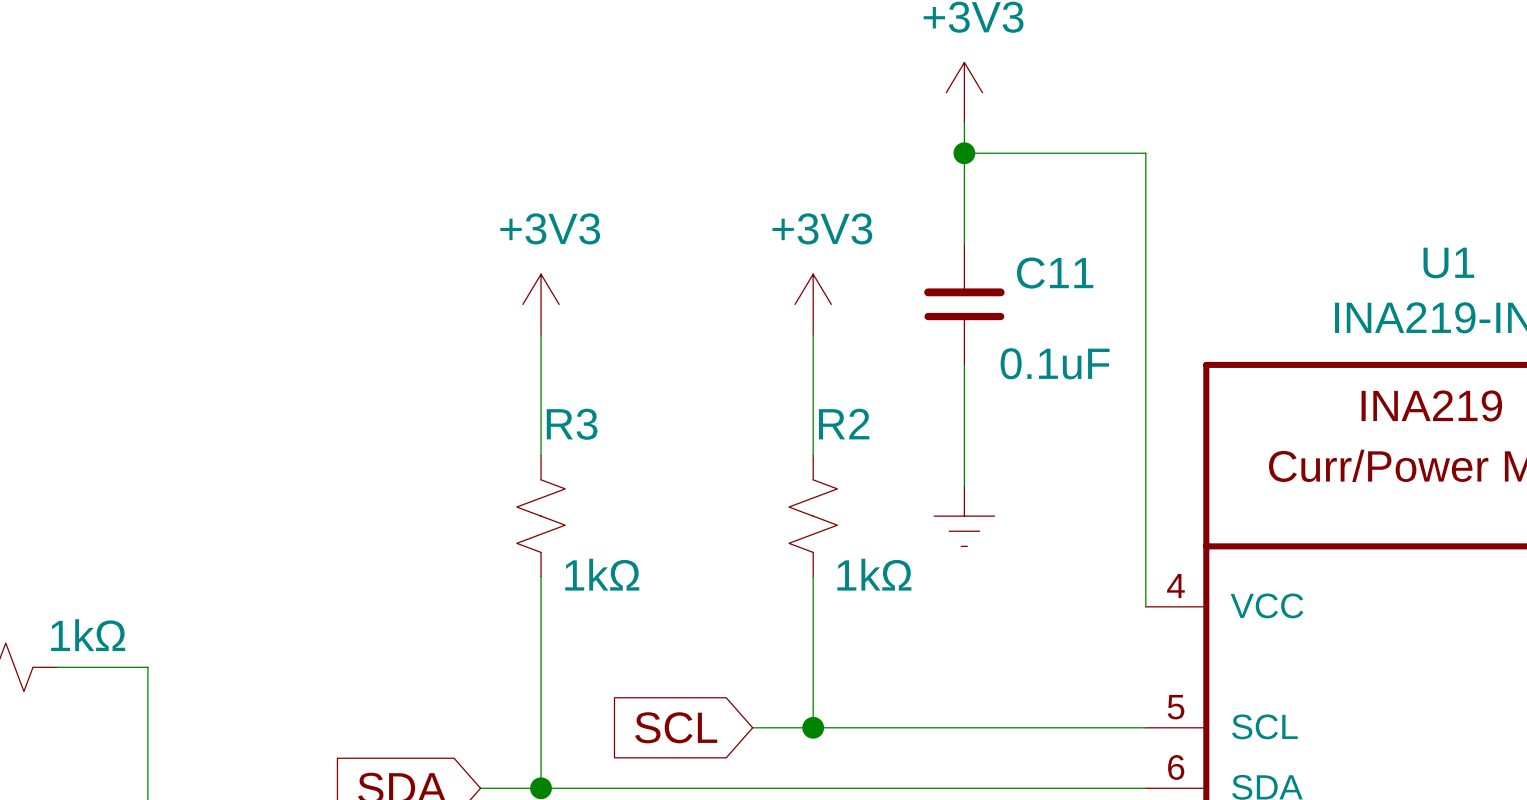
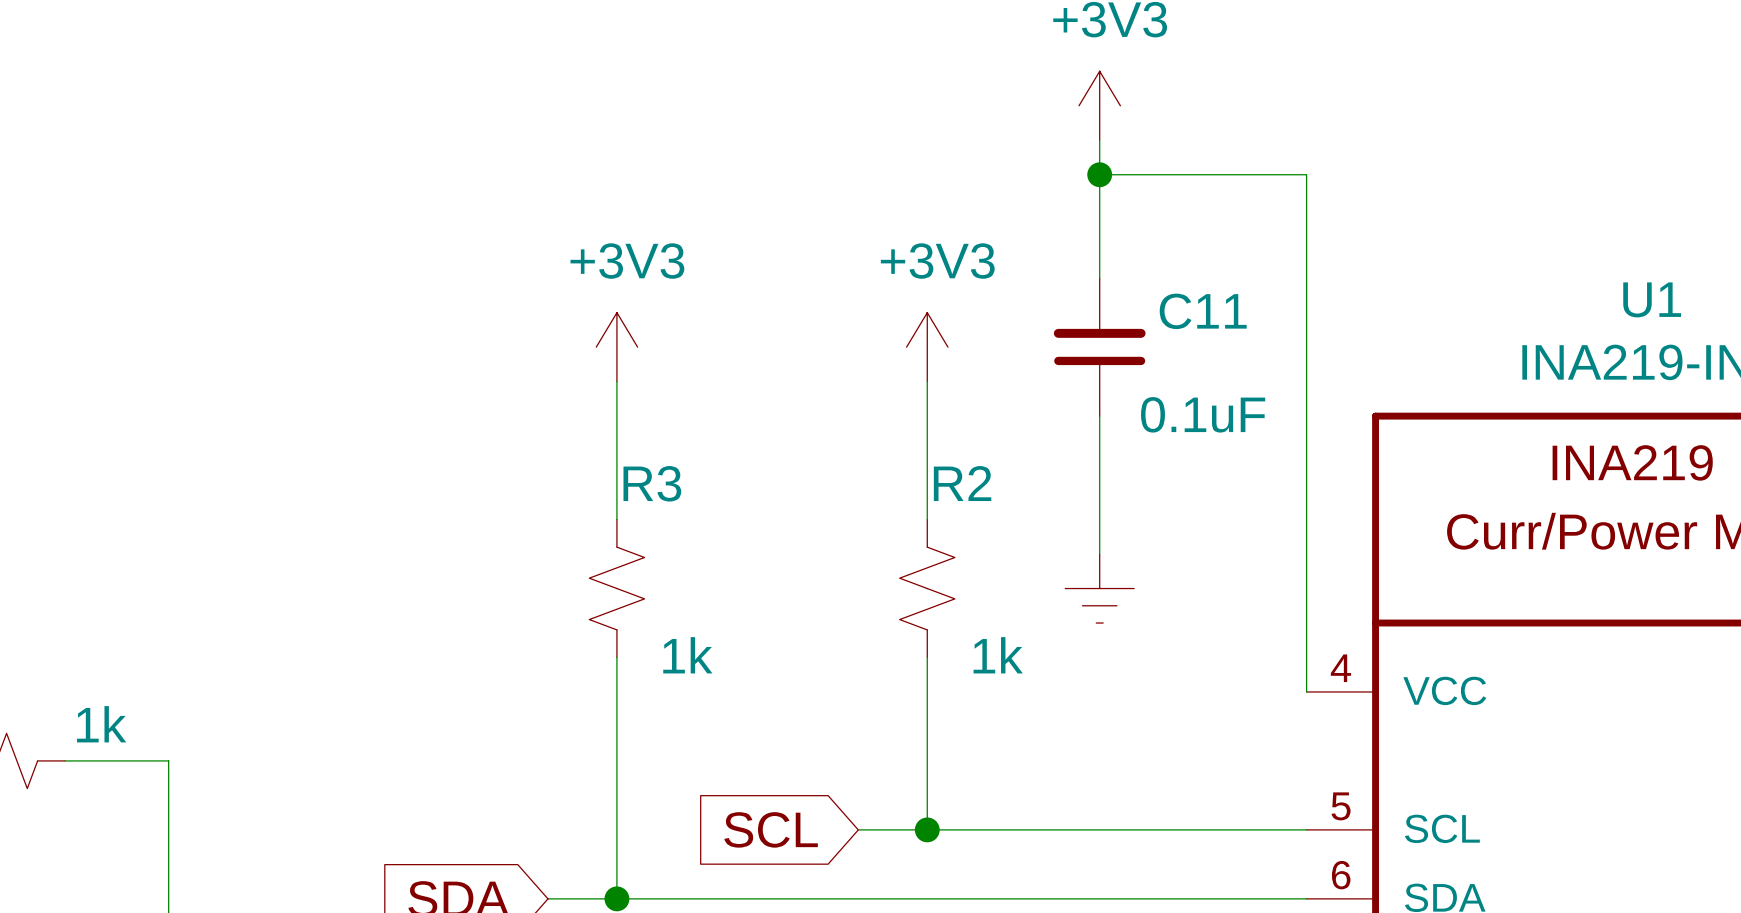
R3 value: 1kΩ (602, 574) -> 1k (687, 655)
R2 value: 1kΩ (874, 574) -> 1k (998, 655)
part value: 1kΩ (88, 635) -> 1k (101, 724)

